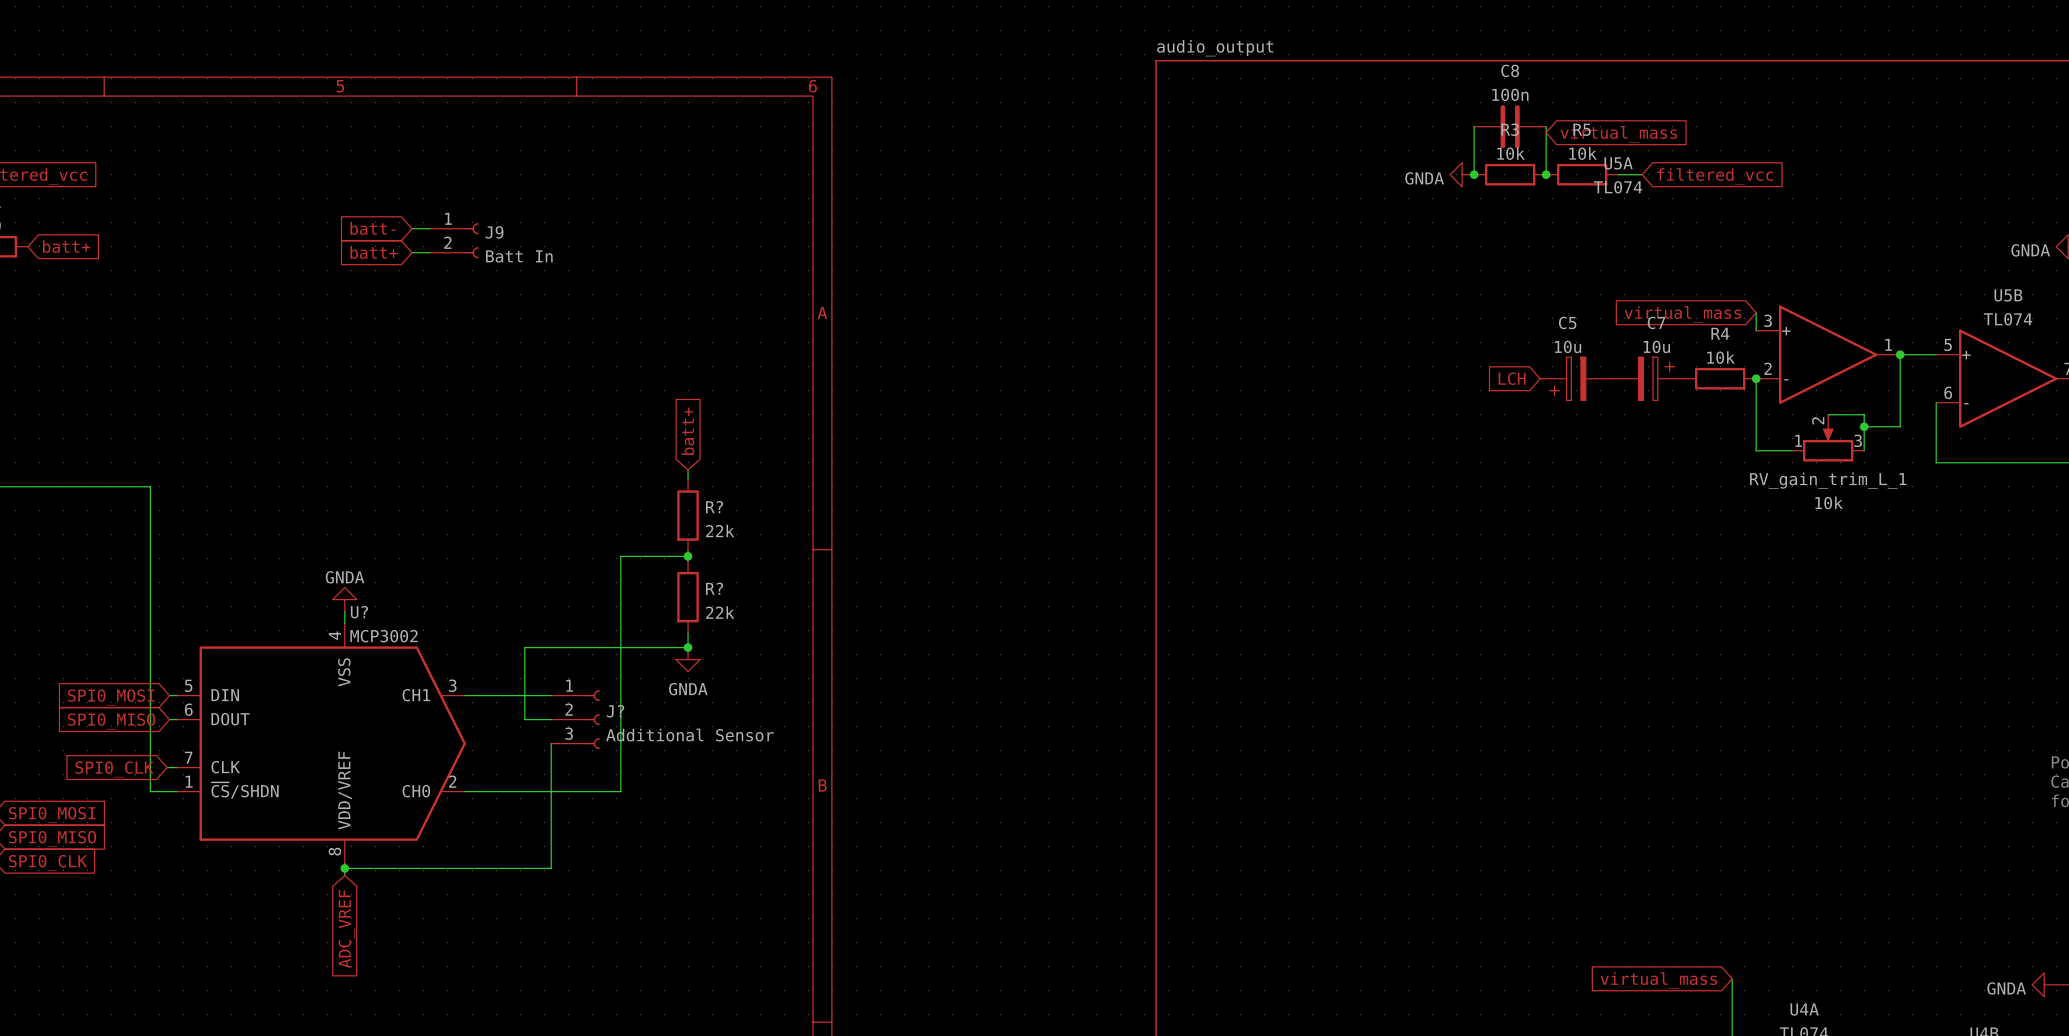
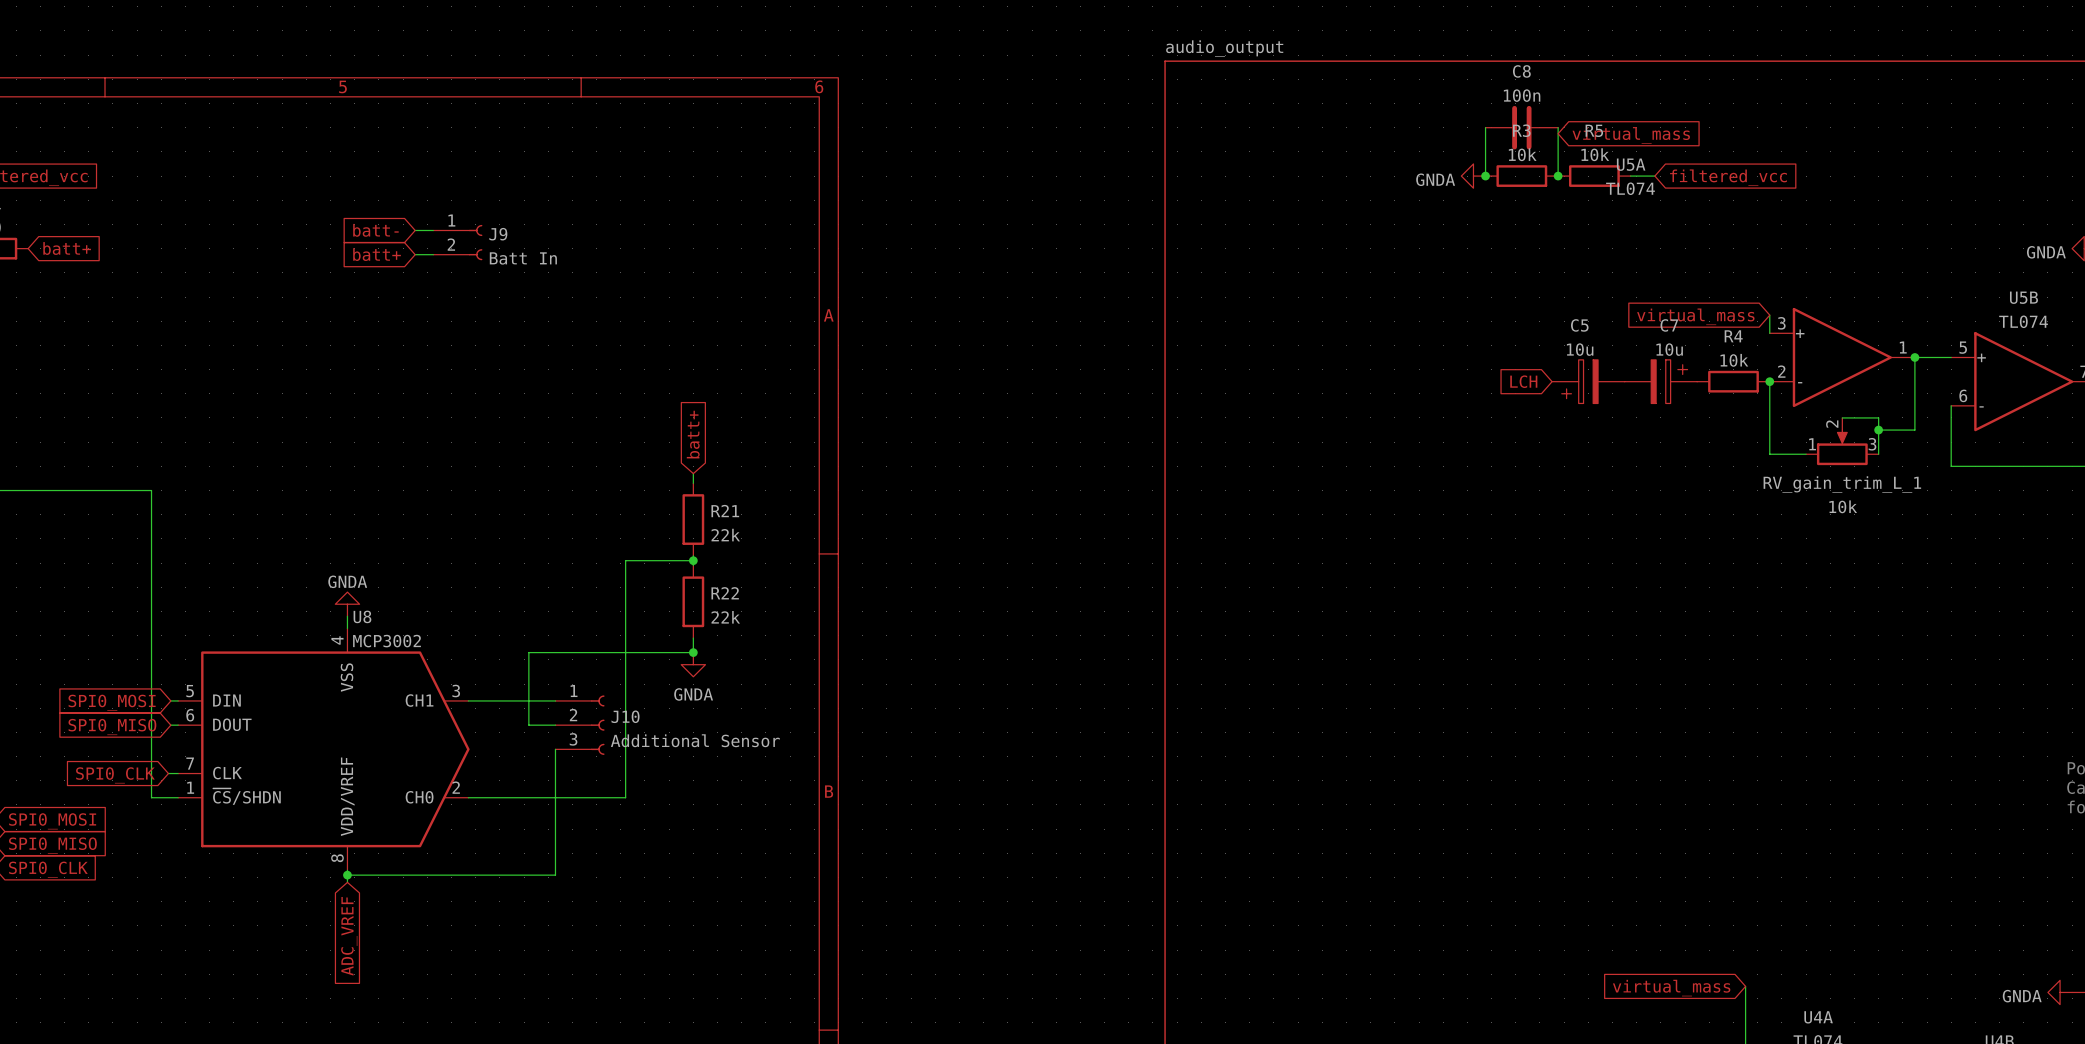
R? name: R? (714, 507) -> R21 (725, 511)
R? name: R? (714, 588) -> R22 (725, 593)
U? name: U? (359, 612) -> U8 (362, 616)
J? name: J? (615, 711) -> J10 (625, 716)

